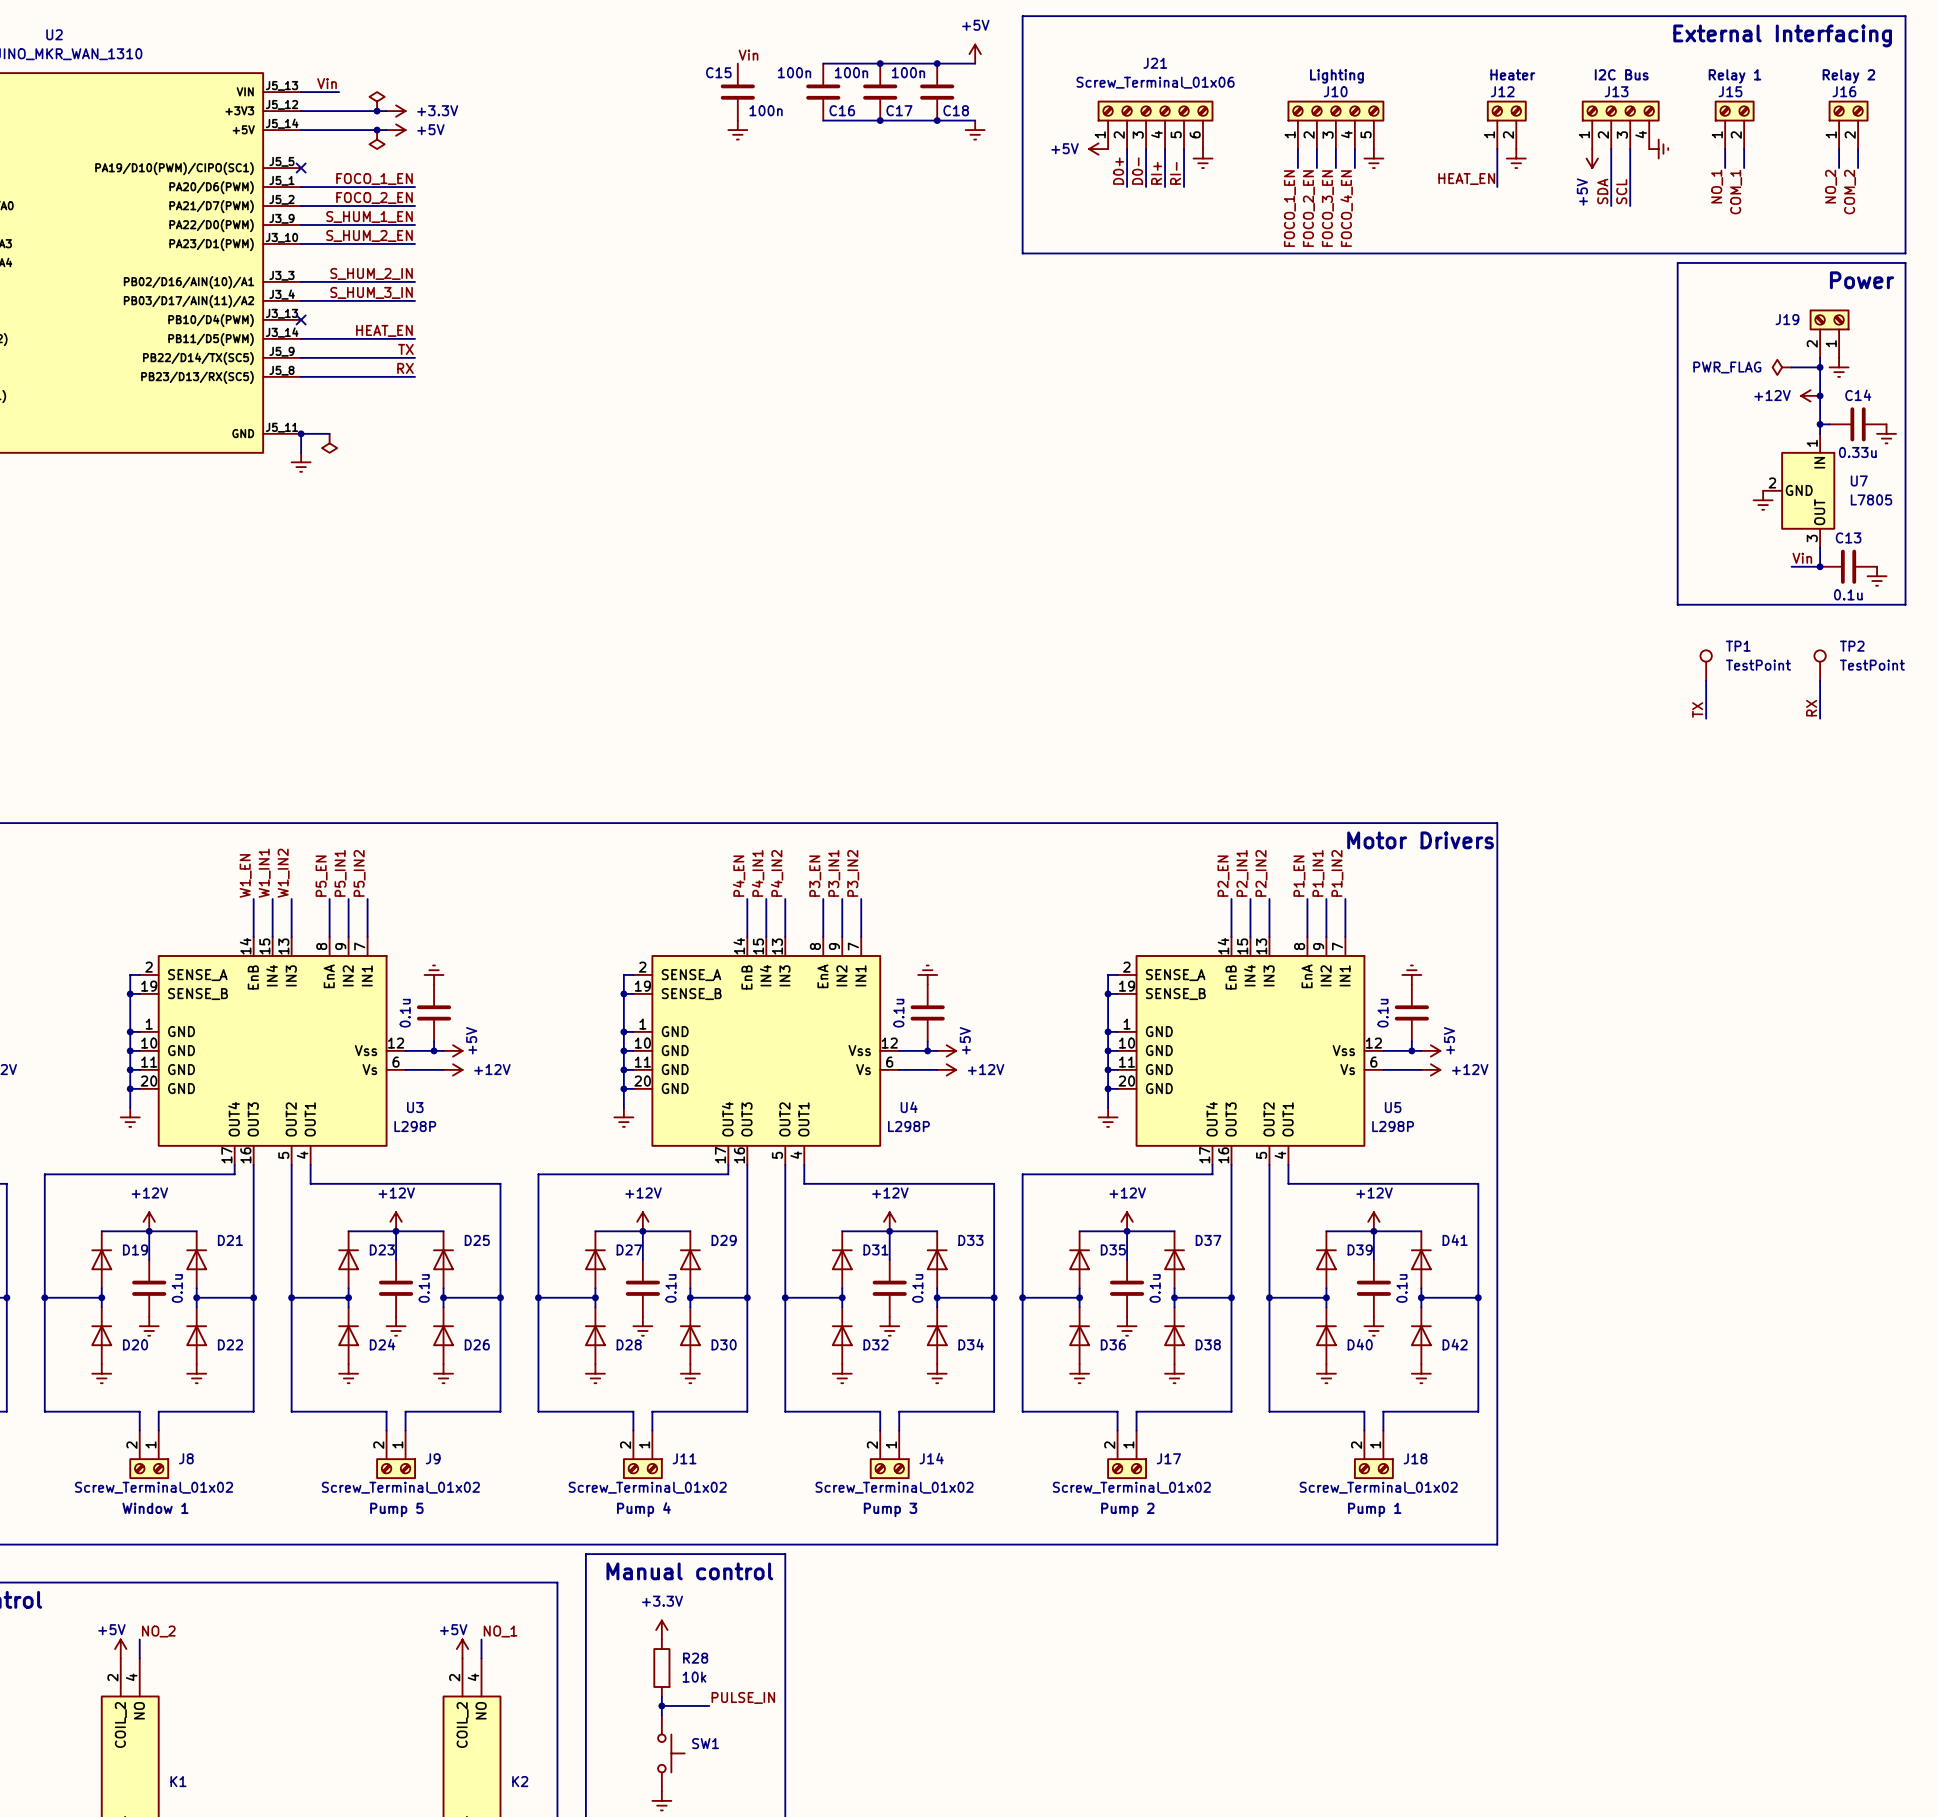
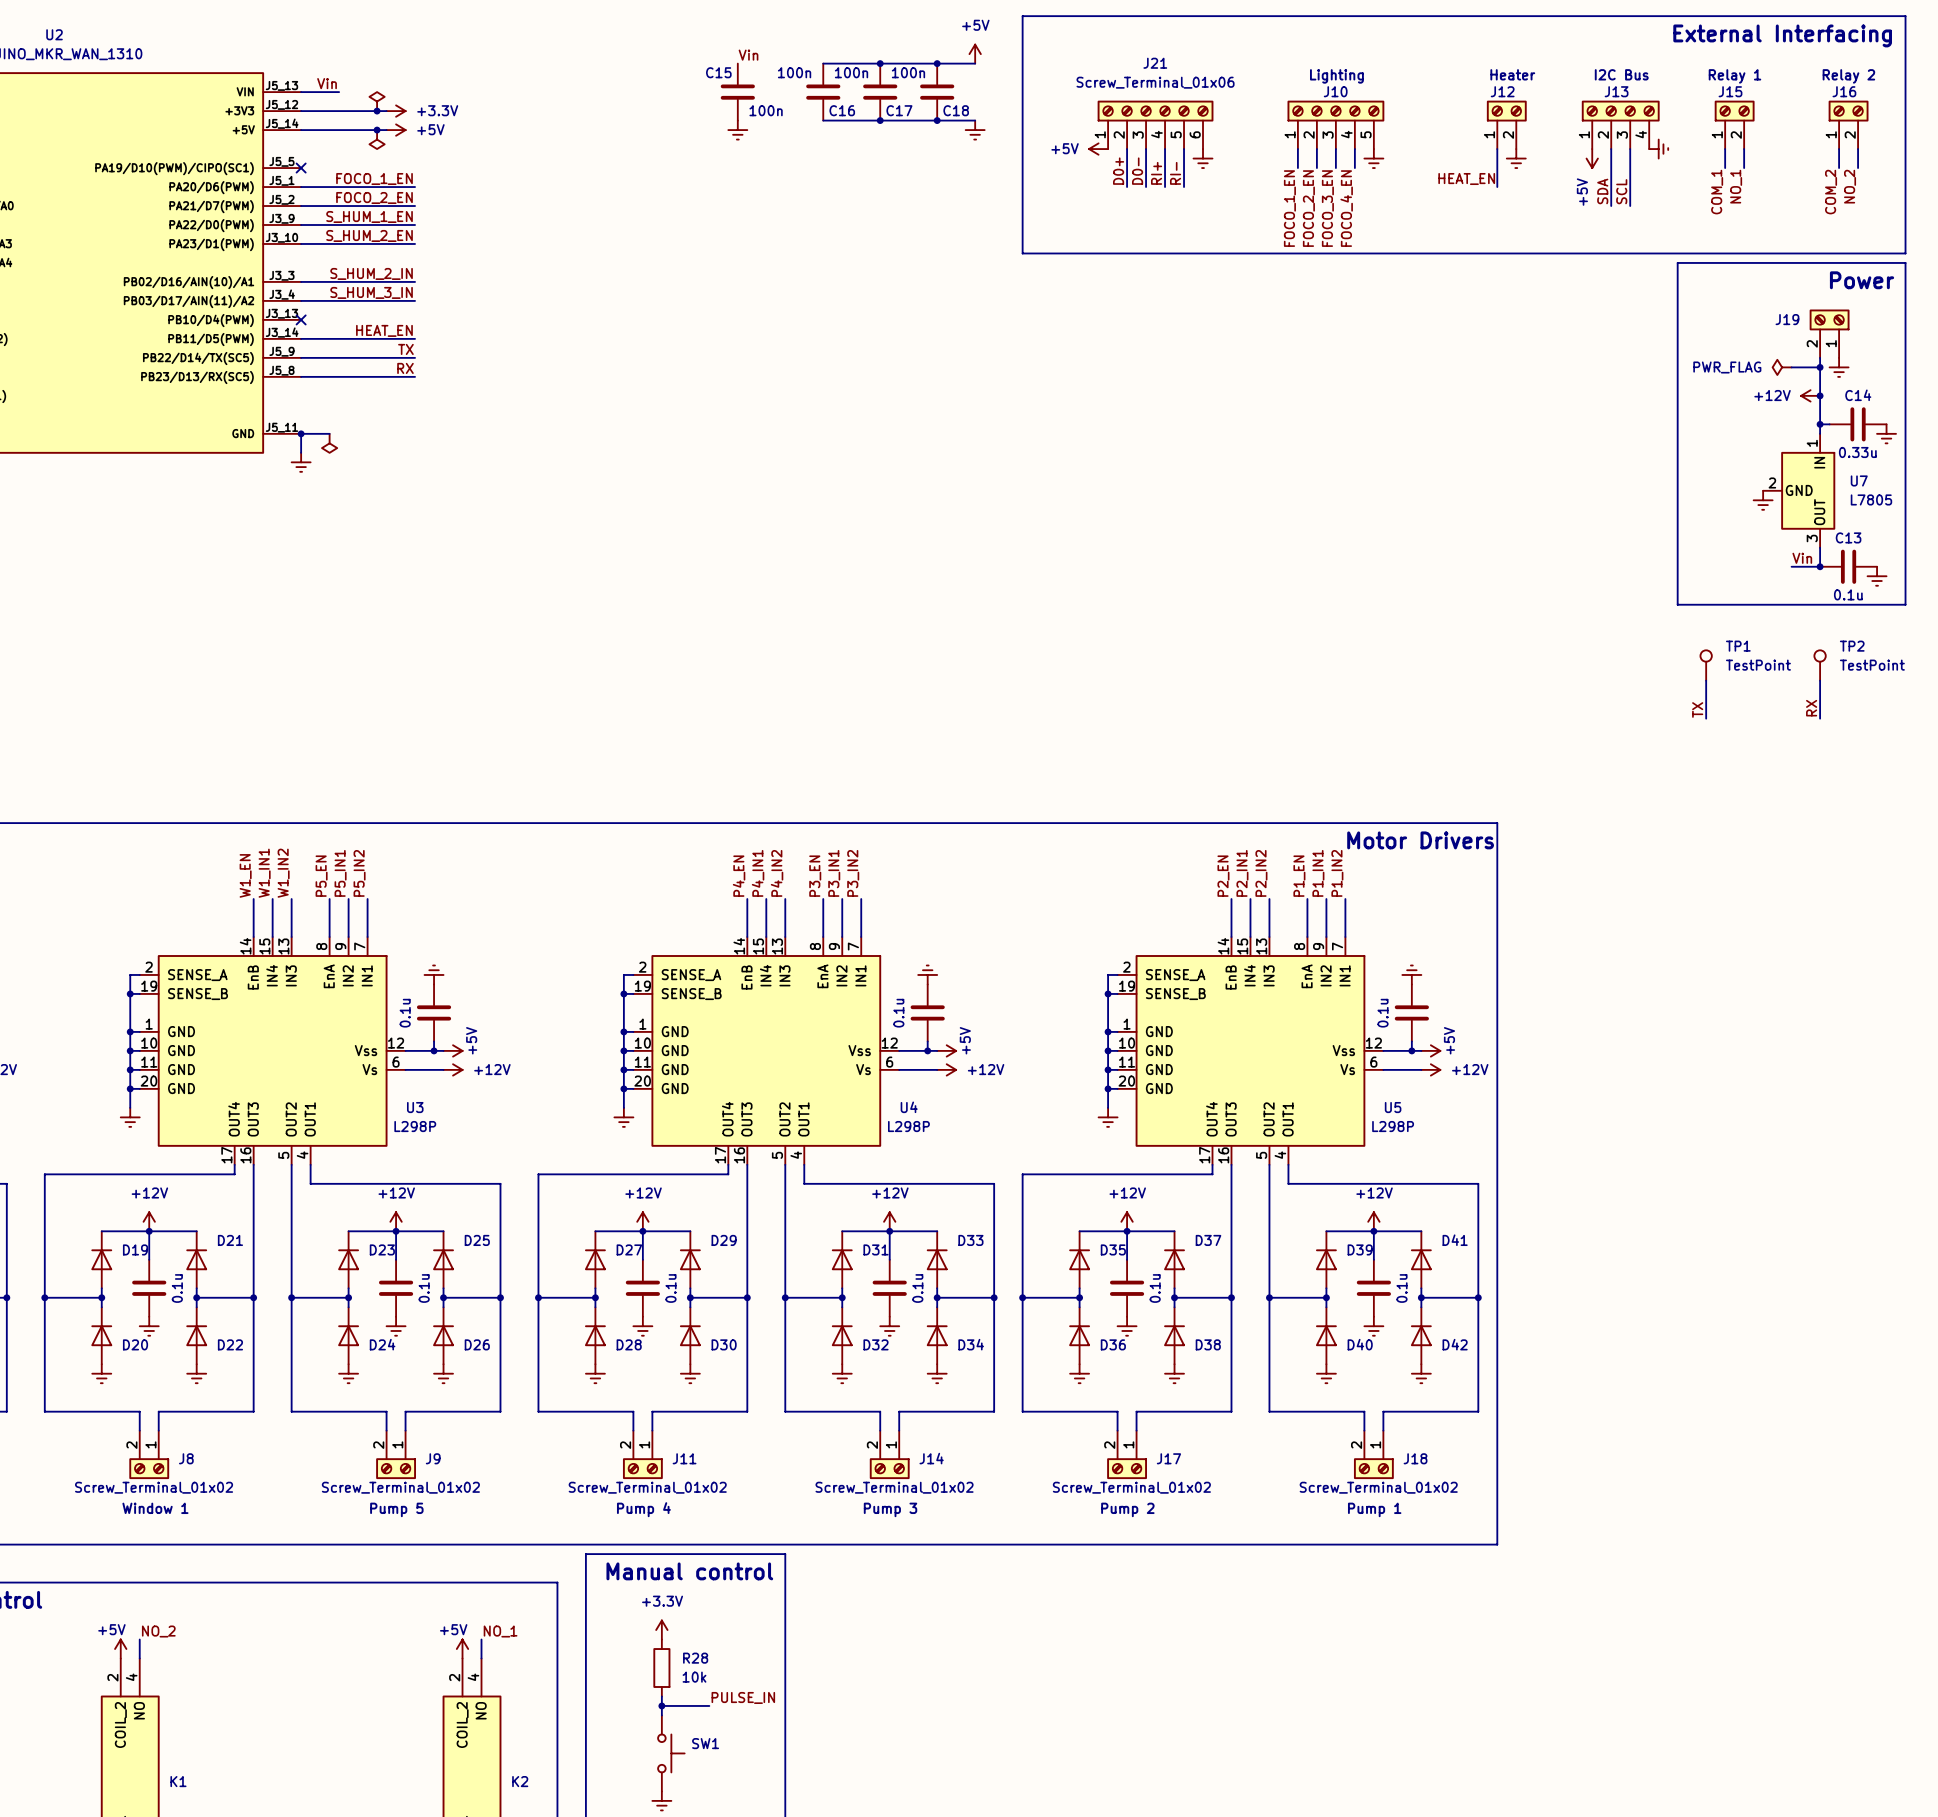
label: NO_1 (1717, 186) -> COM_1 (1717, 192)
label: NO_2 (1831, 186) -> COM_2 (1831, 192)
label: COM_1 (1736, 192) -> NO_1 (1736, 186)
label: COM_2 (1850, 192) -> NO_2 (1850, 186)

